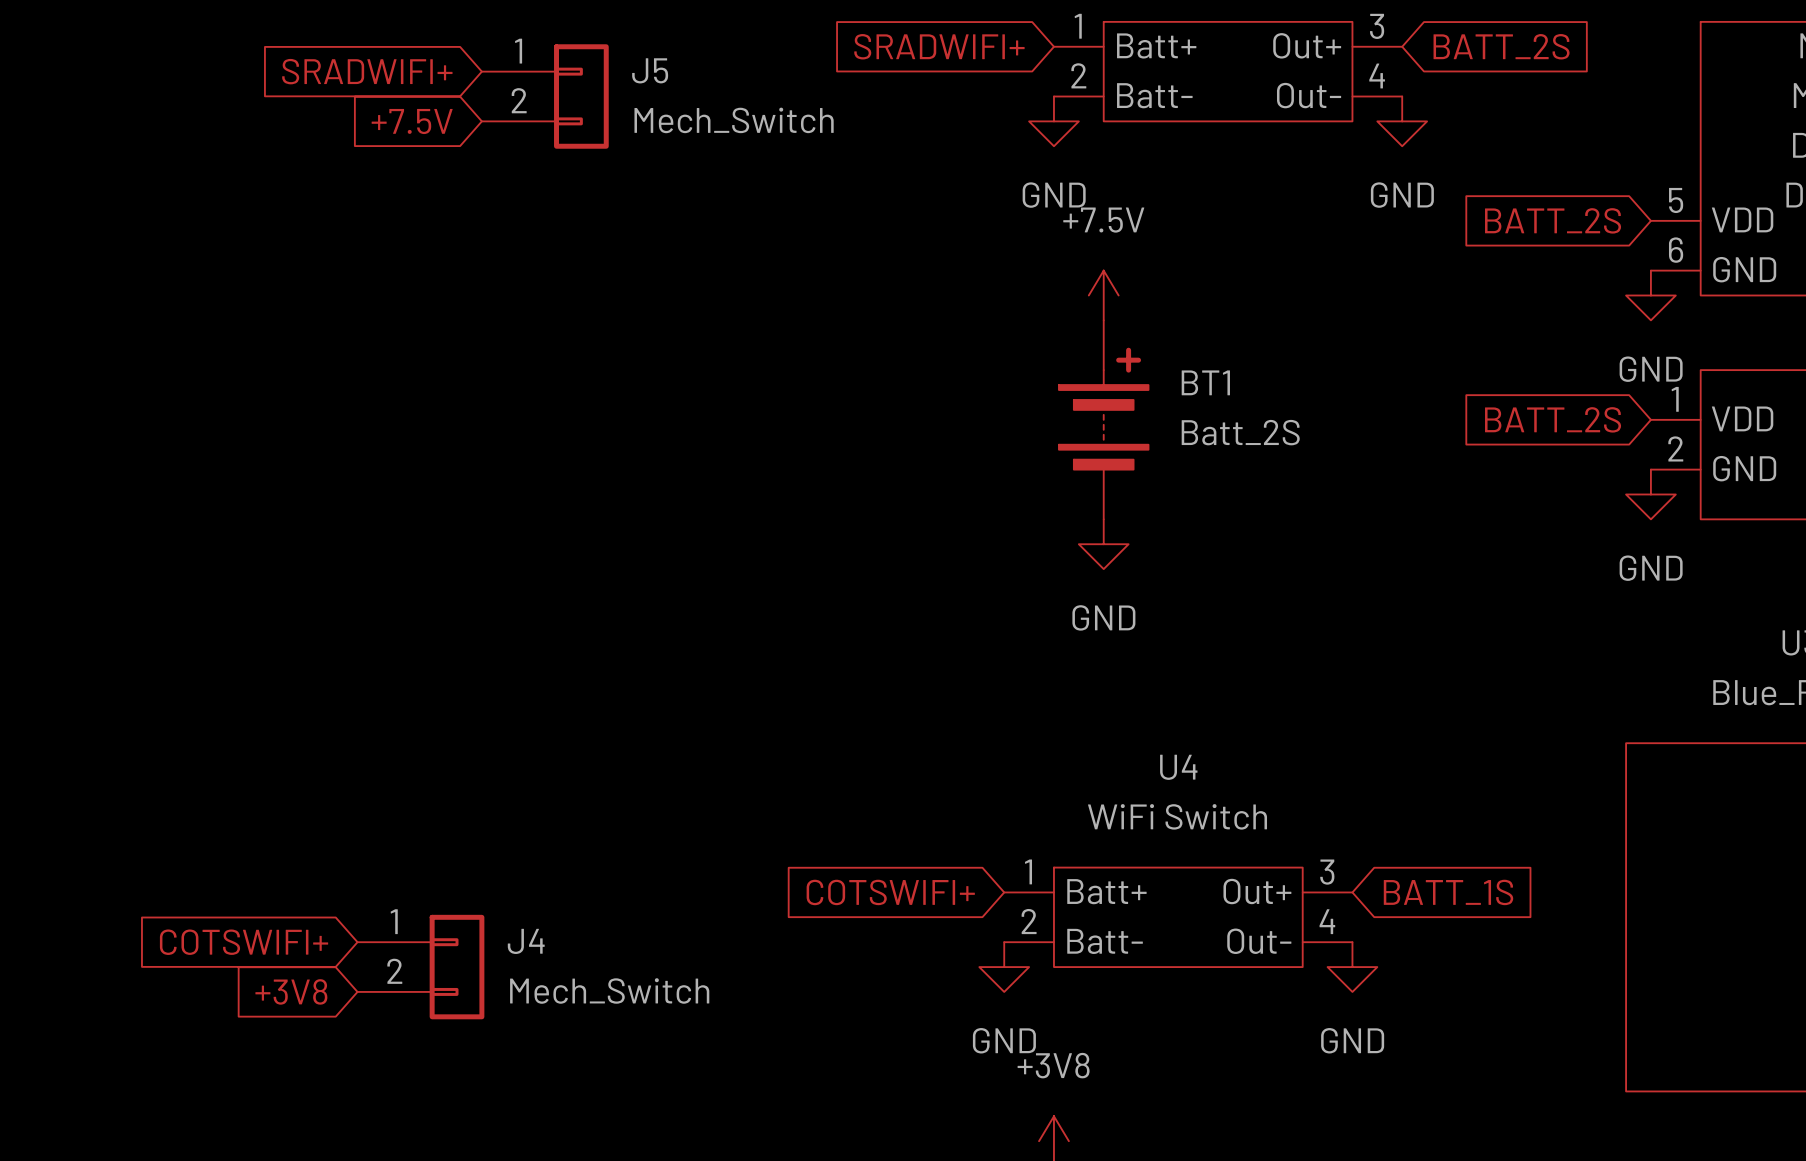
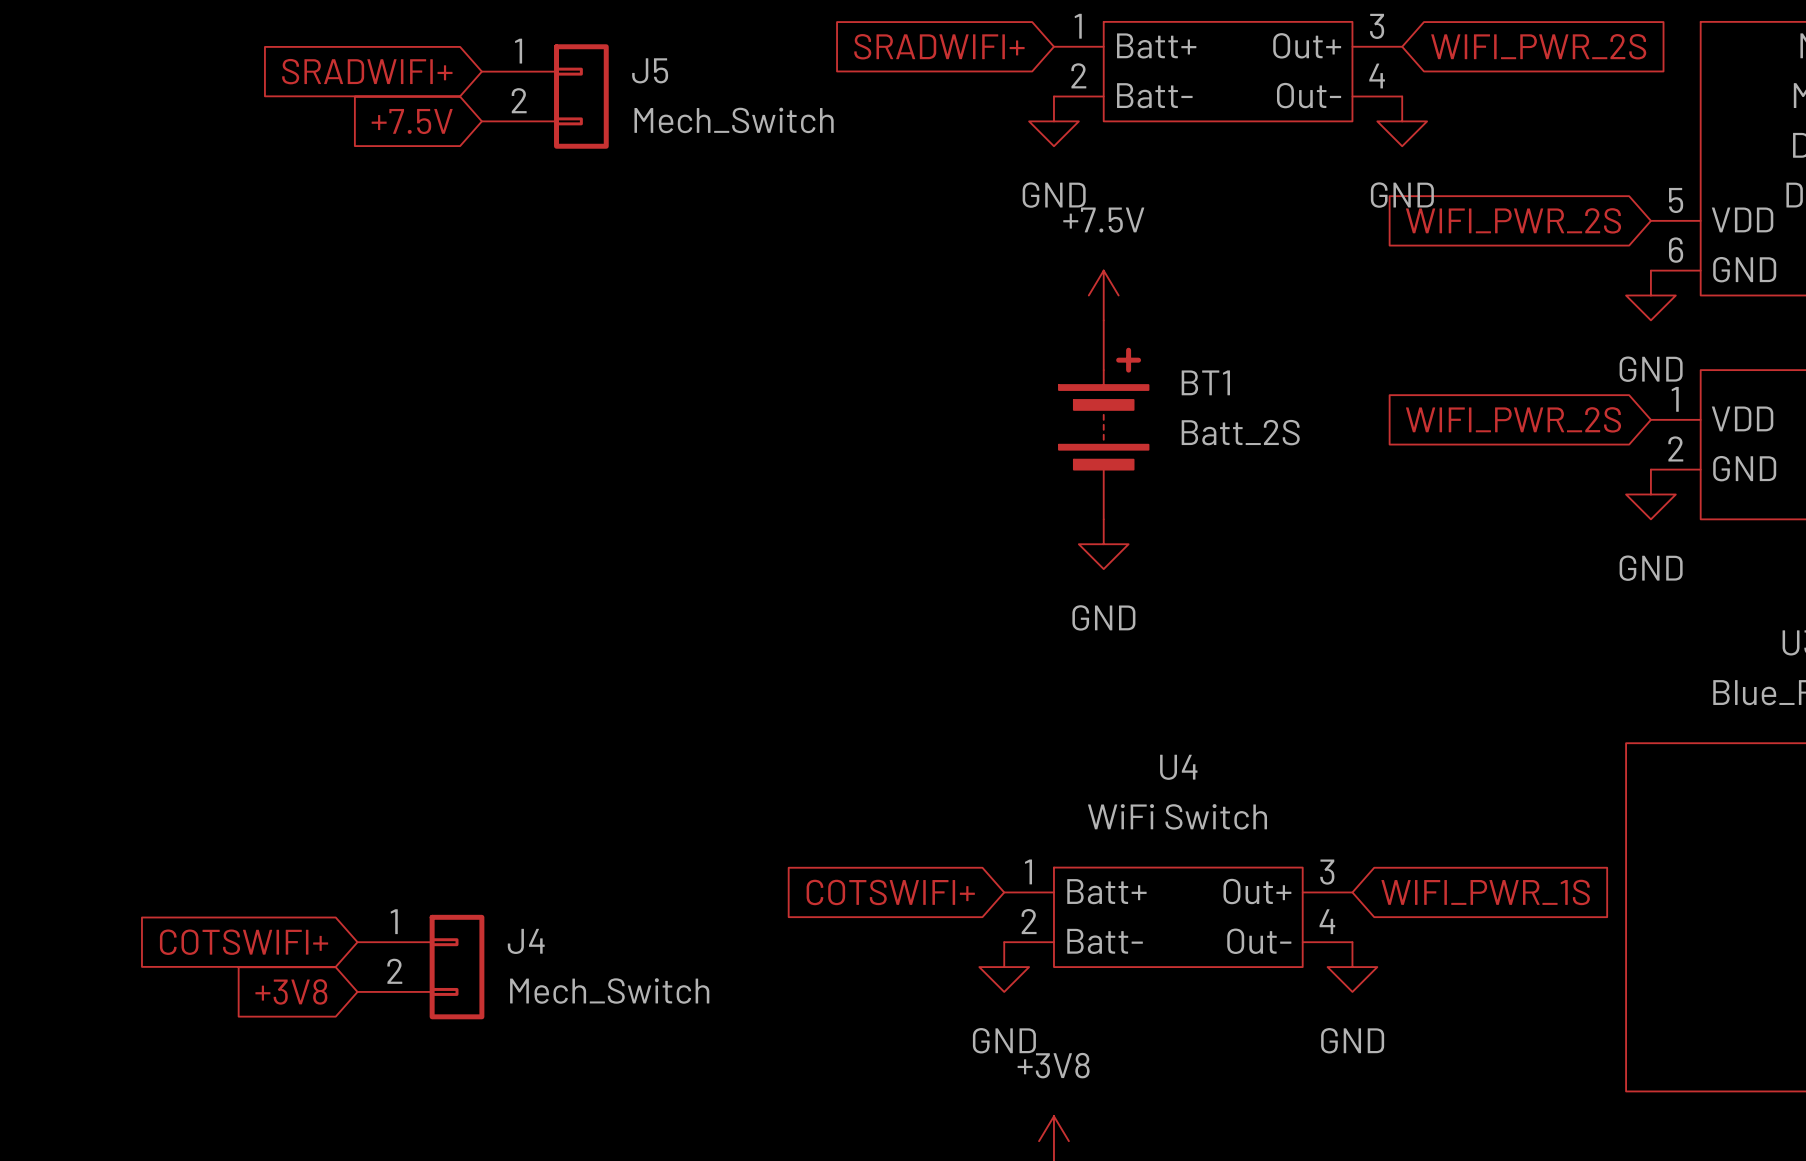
global label: BATT_2S (1501, 46) -> WIFI_PWR_2S (1538, 46)
global label: BATT_2S (1553, 220) -> WIFI_PWR_2S (1513, 220)
global label: BATT_2S (1553, 419) -> WIFI_PWR_2S (1513, 419)
global label: BATT_1S (1448, 892) -> WIFI_PWR_1S (1485, 892)

